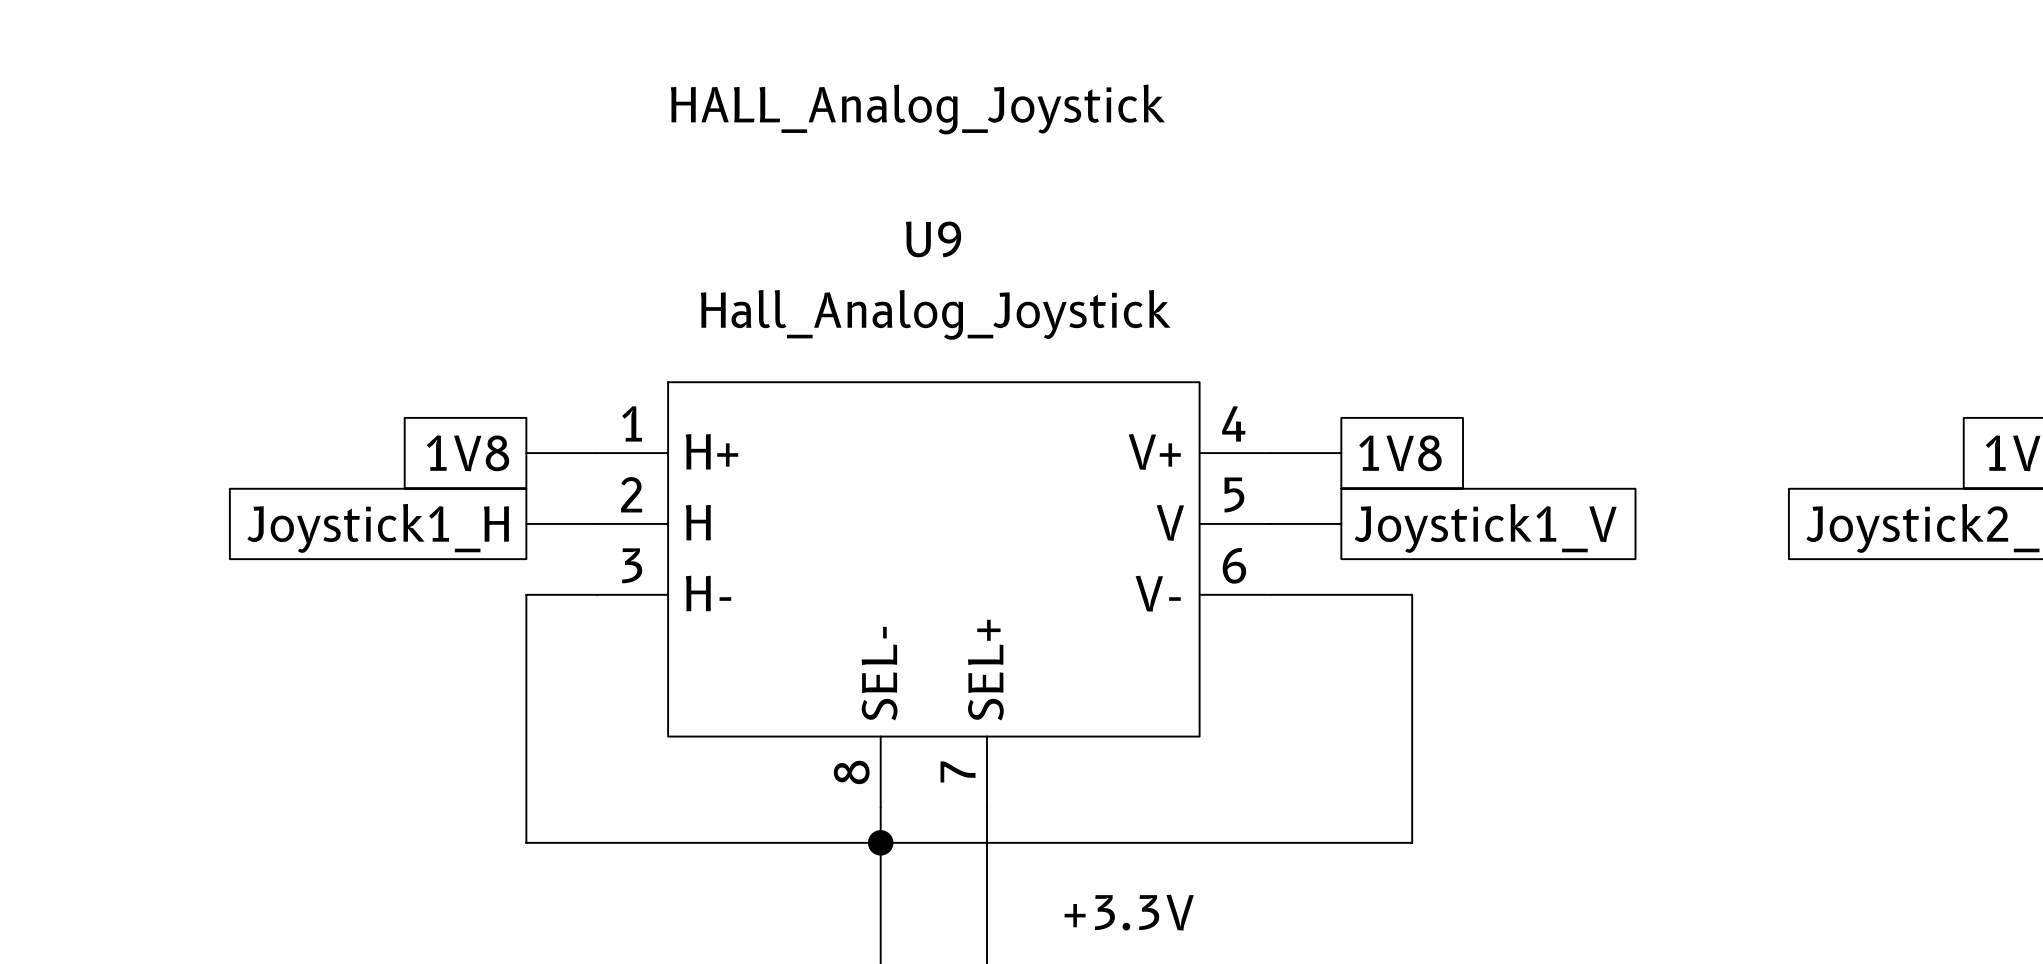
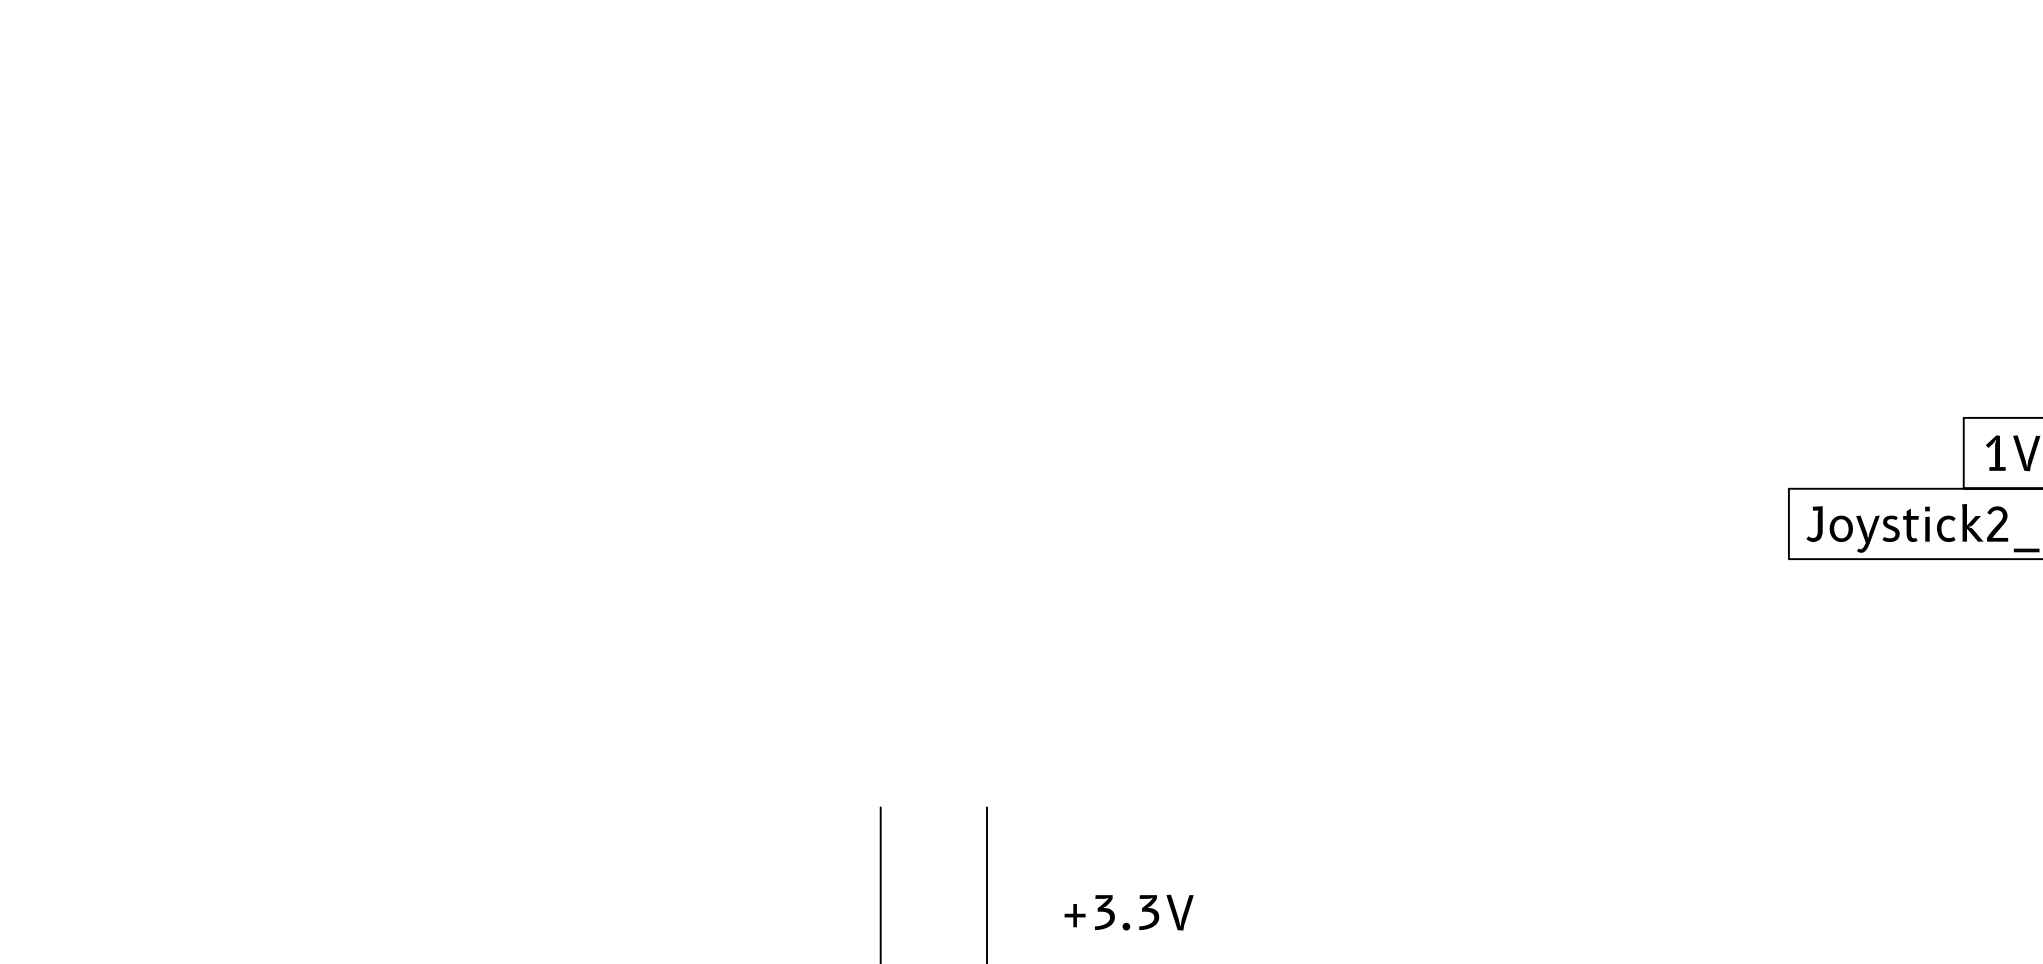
text: HALL_Analog_Joystick (917, 109) -> none
global label: 1V8 (467, 453) -> none
wire: (526, 453) (597, 453) -> none
wire: (1270, 453) (1341, 453) -> none
global label: 1V8 (1400, 453) -> none
wire: (526, 523) (597, 523) -> none
wire: (1270, 523) (1341, 523) -> none
global label: Joystick1_H (378, 528) -> none
global label: Joystick1_V (1485, 528) -> none
wire: (597, 594) (526, 594) (526, 842) (1412, 842) (1412, 594) (1270, 594) -> none
U9: Hall_Analog_Joystick (933, 594) -> none
junction: (880, 842) -> none

